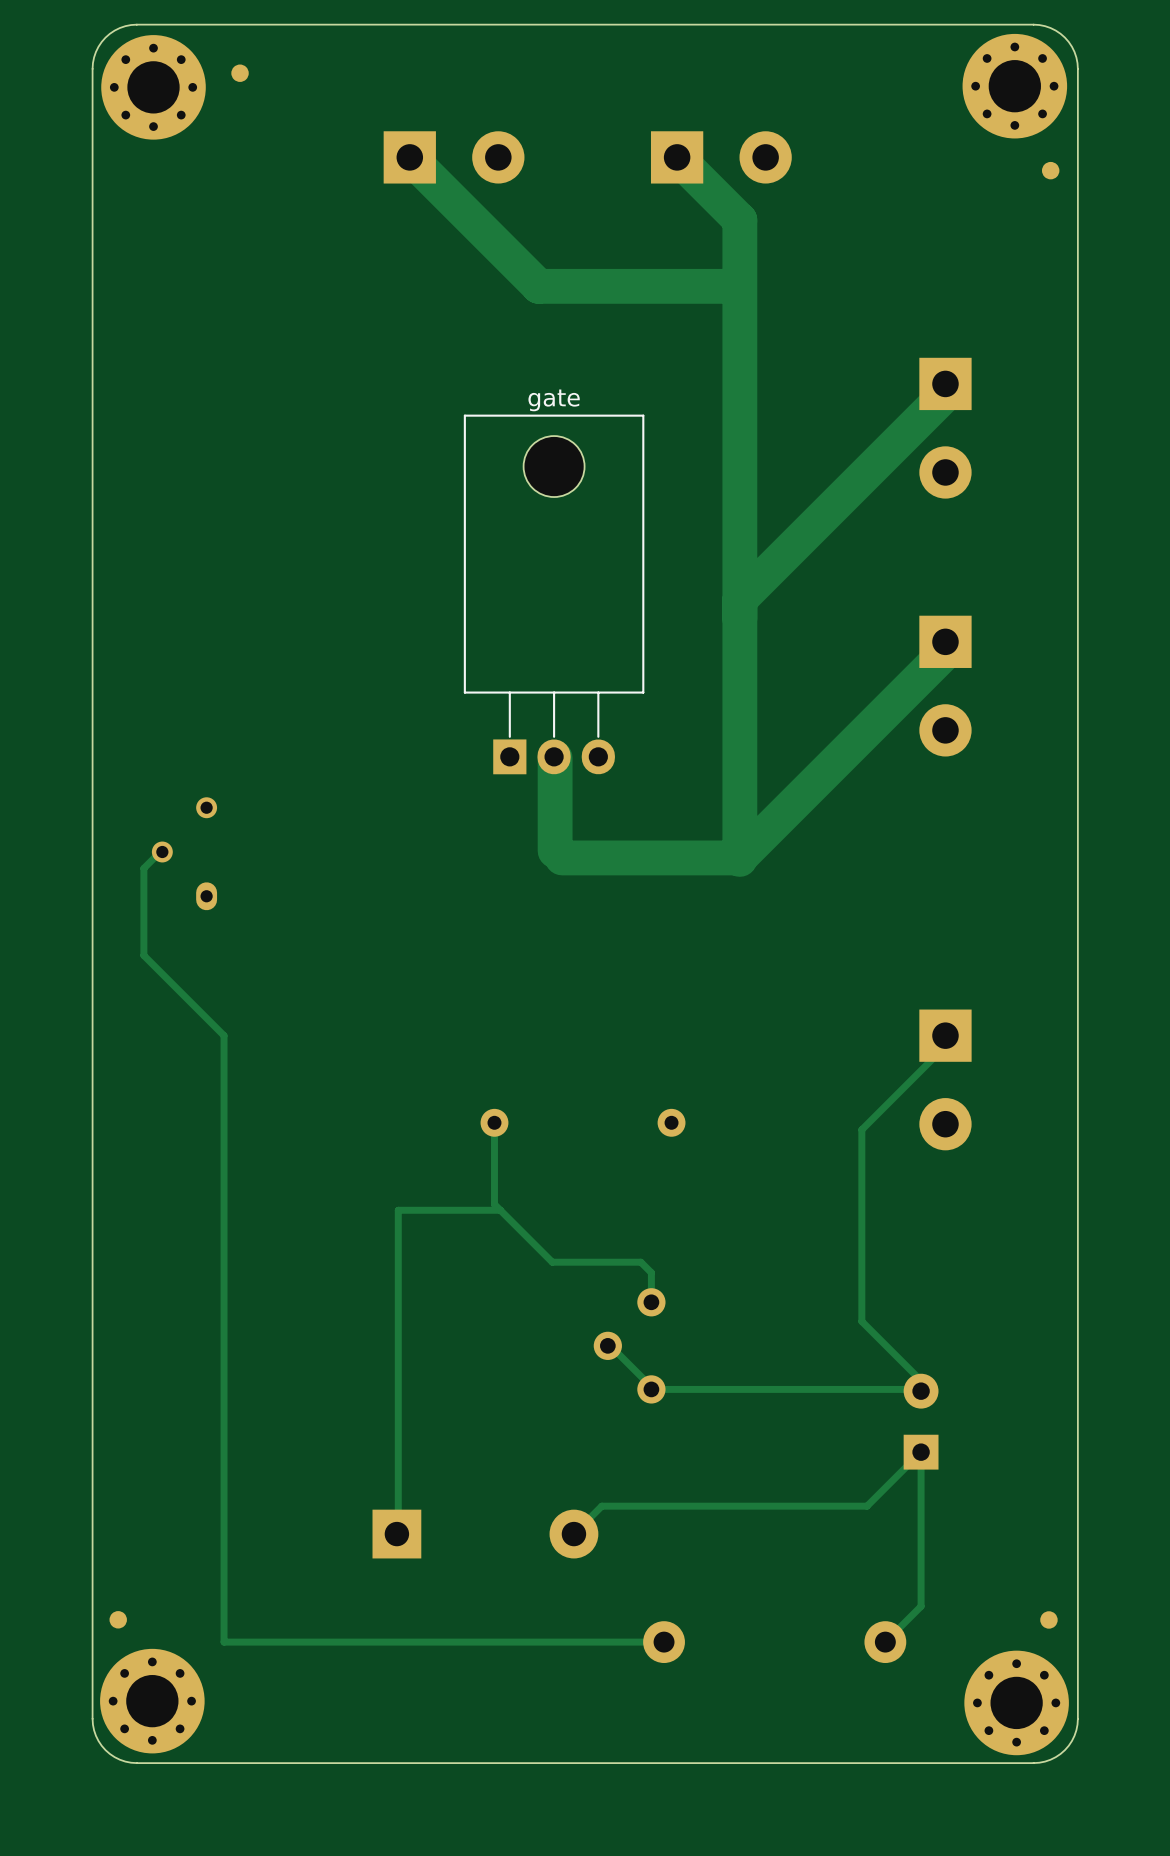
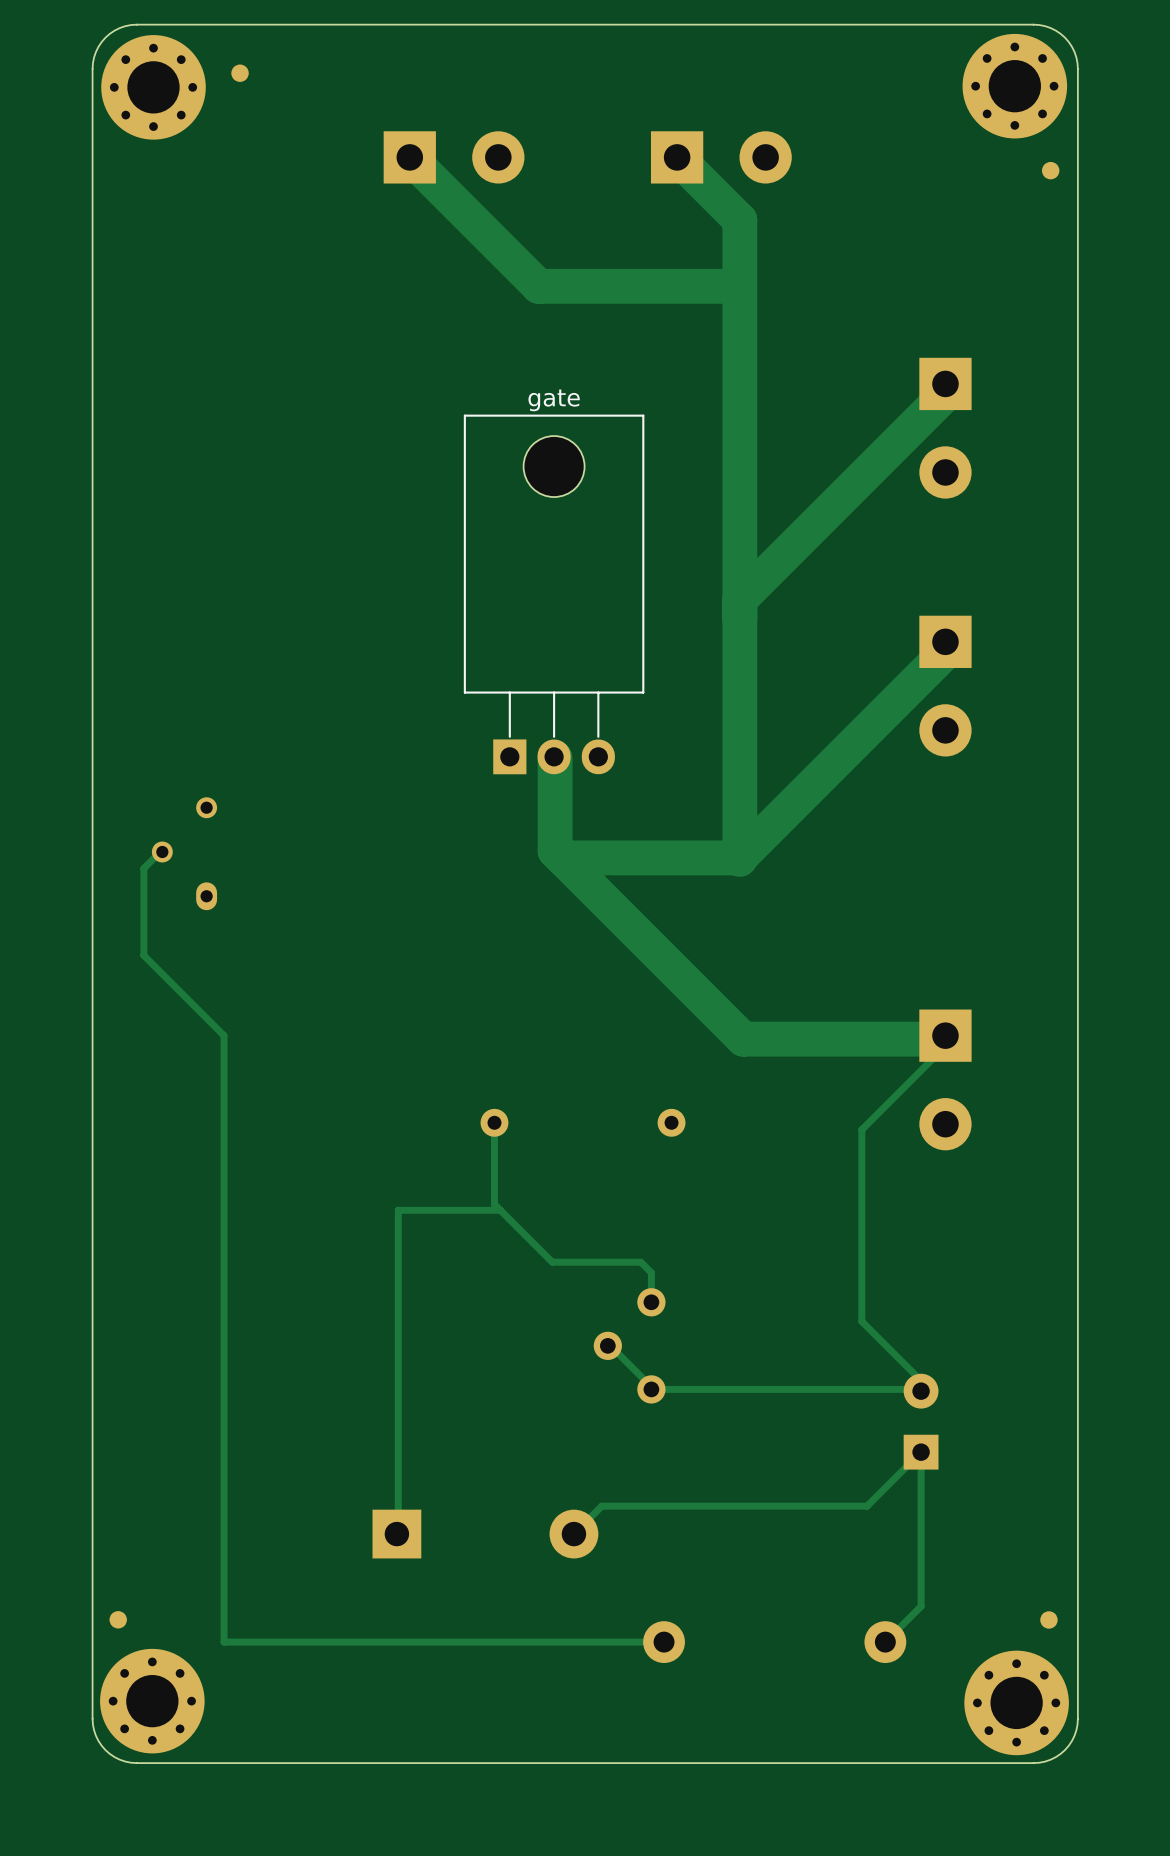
track: none -> (555, 850) (743, 1039) (938, 1039)

